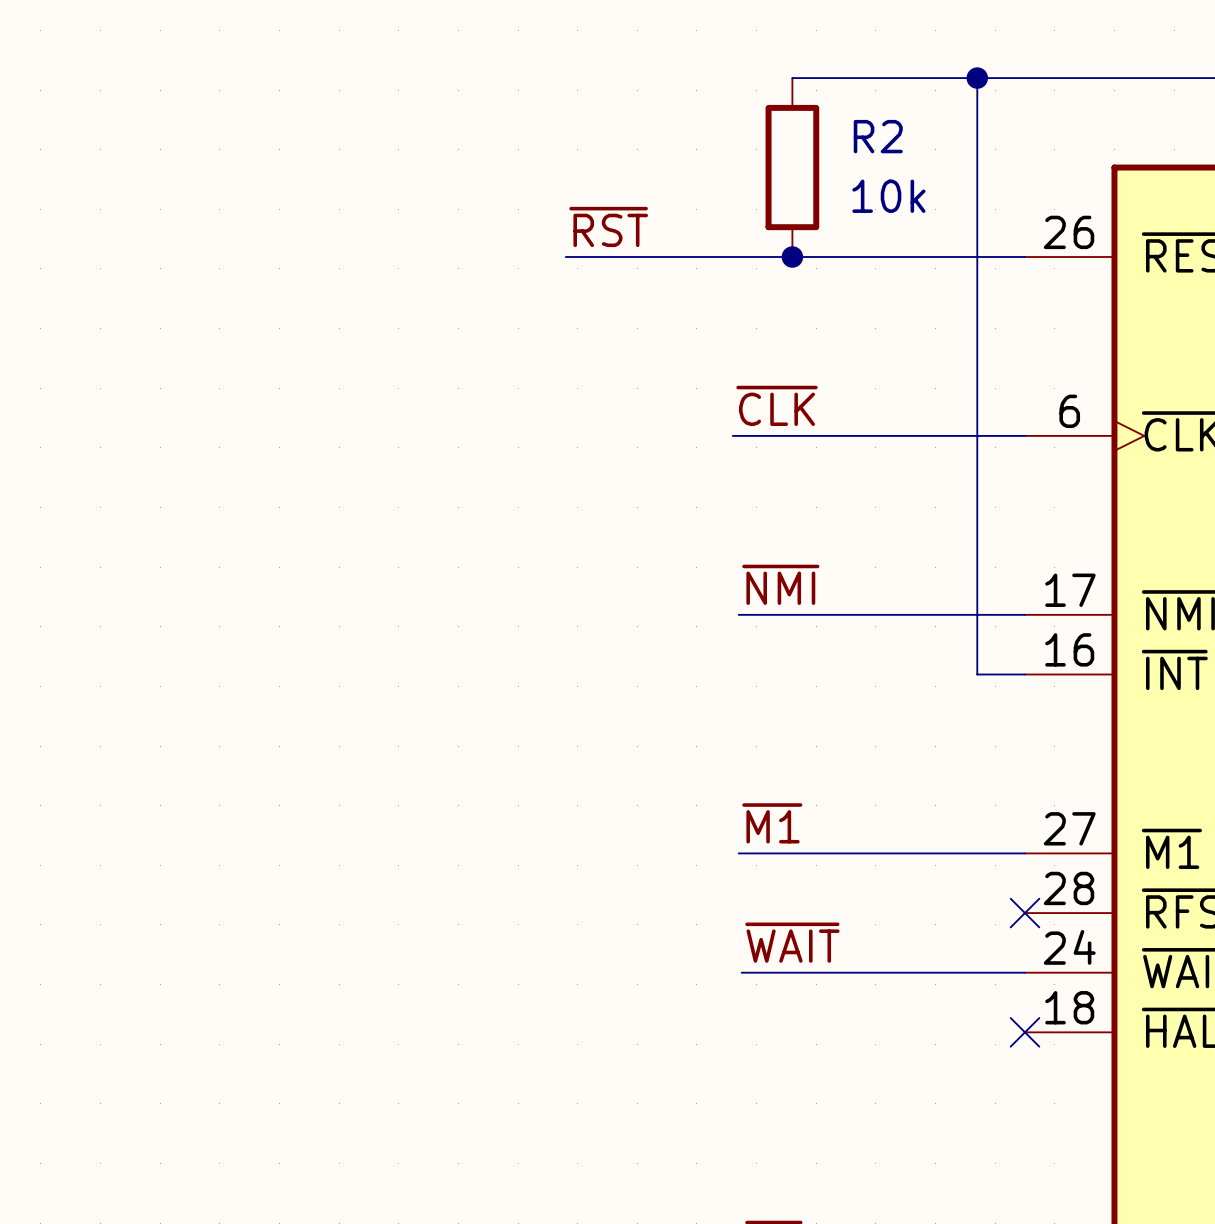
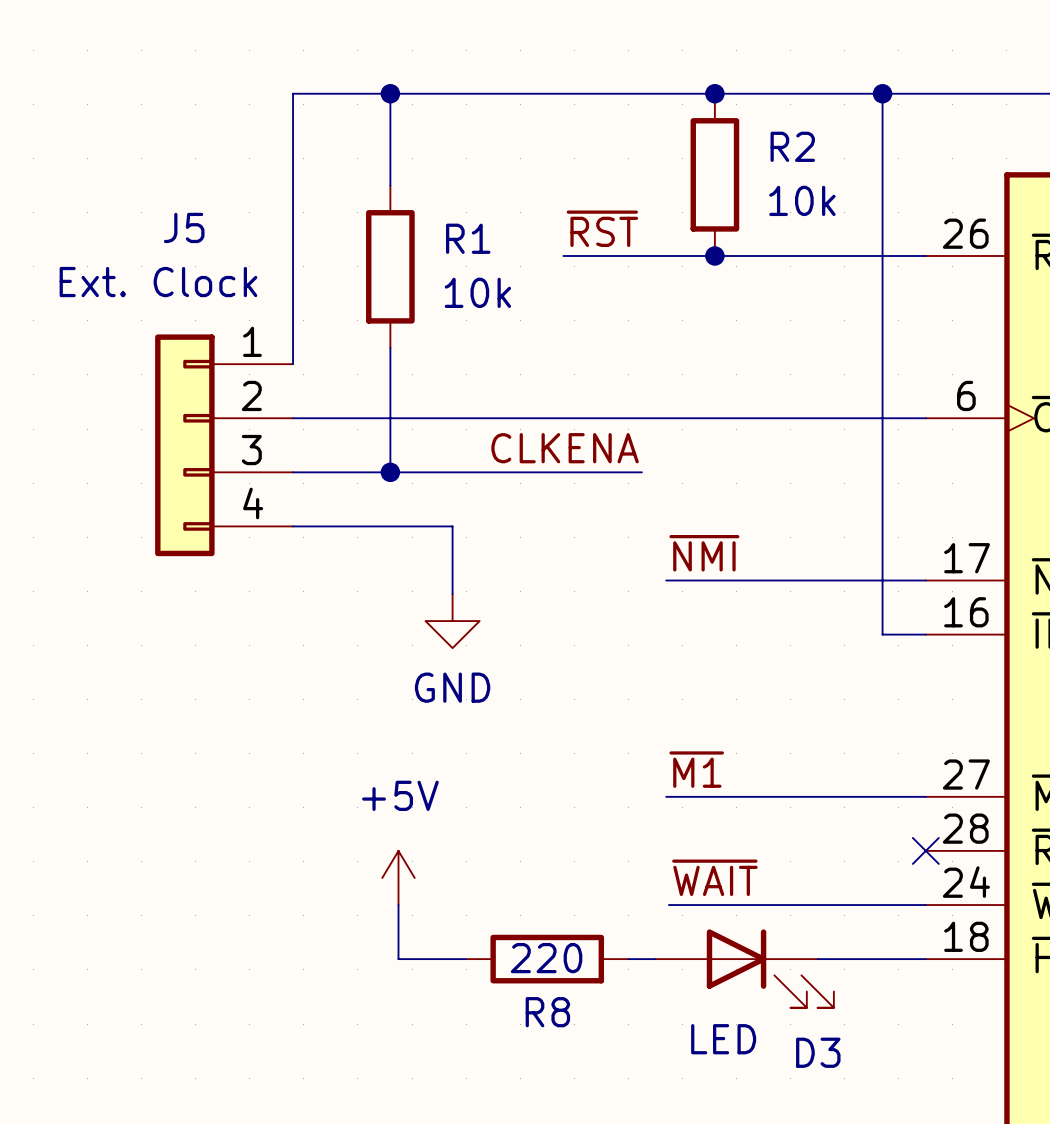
wire: none -> (390, 93) (390, 185)
junction: none -> (390, 93)
wire: none -> (714, 93) (293, 93) (293, 364)
junction: none -> (714, 93)
label position: ~{RST} (608, 226) -> ~{RST} (602, 228)
wire: (565, 257) (625, 257) -> none
R1: none -> 10k (390, 266)
wire: none -> (390, 347) (390, 472)
label: ~{CLK} (777, 405) -> none
wire: none -> (293, 418) (660, 418)
J5: none -> Ext. Clock (224, 445)
label: none -> CLKENA (565, 448)
wire: none -> (293, 472) (641, 472)
junction: none -> (390, 472)
wire: none -> (293, 526) (452, 526) (452, 594)
power symbol: none -> GND (452, 621)
power symbol: none -> +5V (398, 877)
wire: none -> (398, 905) (398, 959) (466, 959)
R8: none -> 220 (547, 959)
wire: none -> (628, 959) (655, 959)
wire: none -> (817, 959) (925, 959)
no-connect mark: (1025, 1032) -> none
D3: none -> LED (744, 968)

